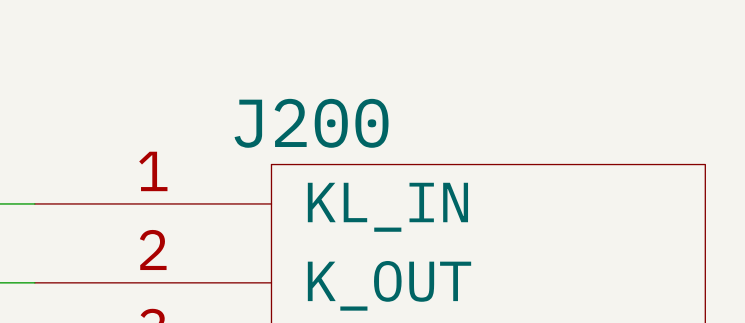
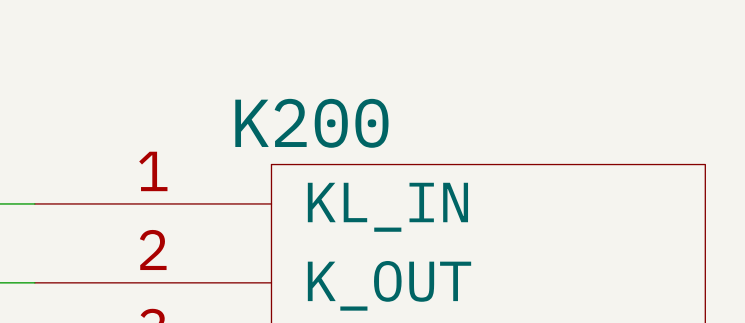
J200 name: J200 (311, 123) -> K200 (311, 123)

